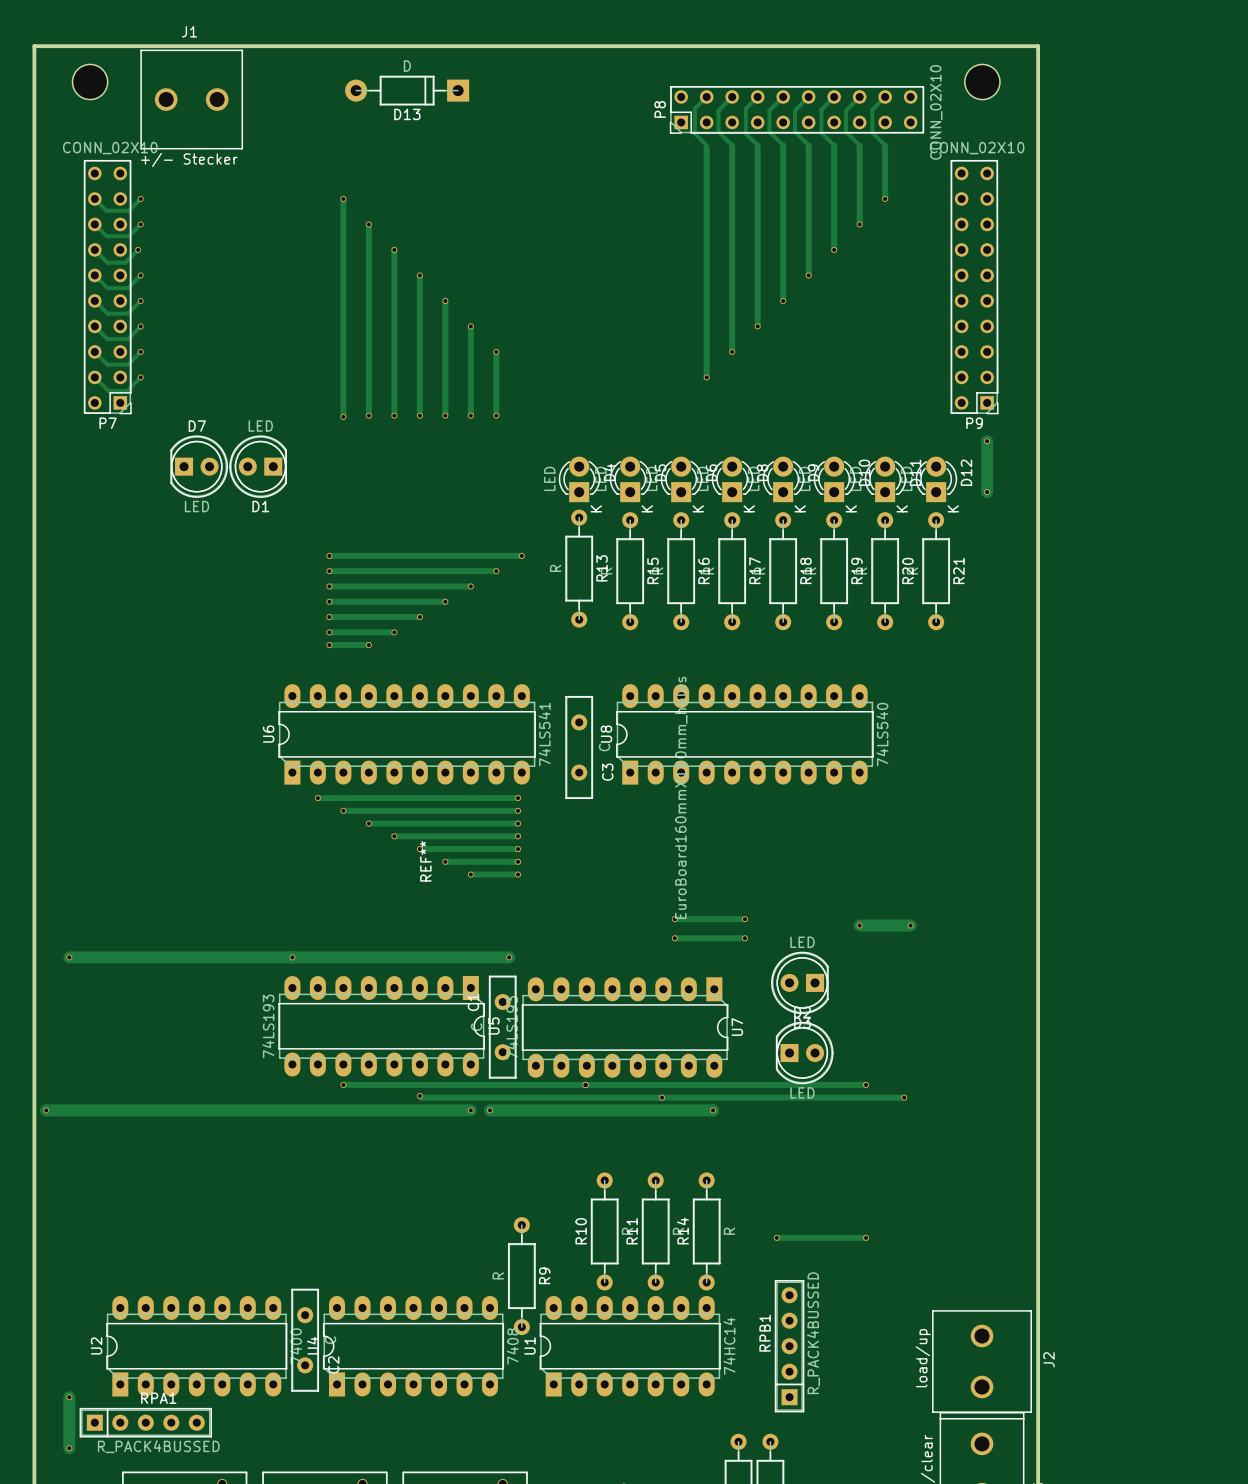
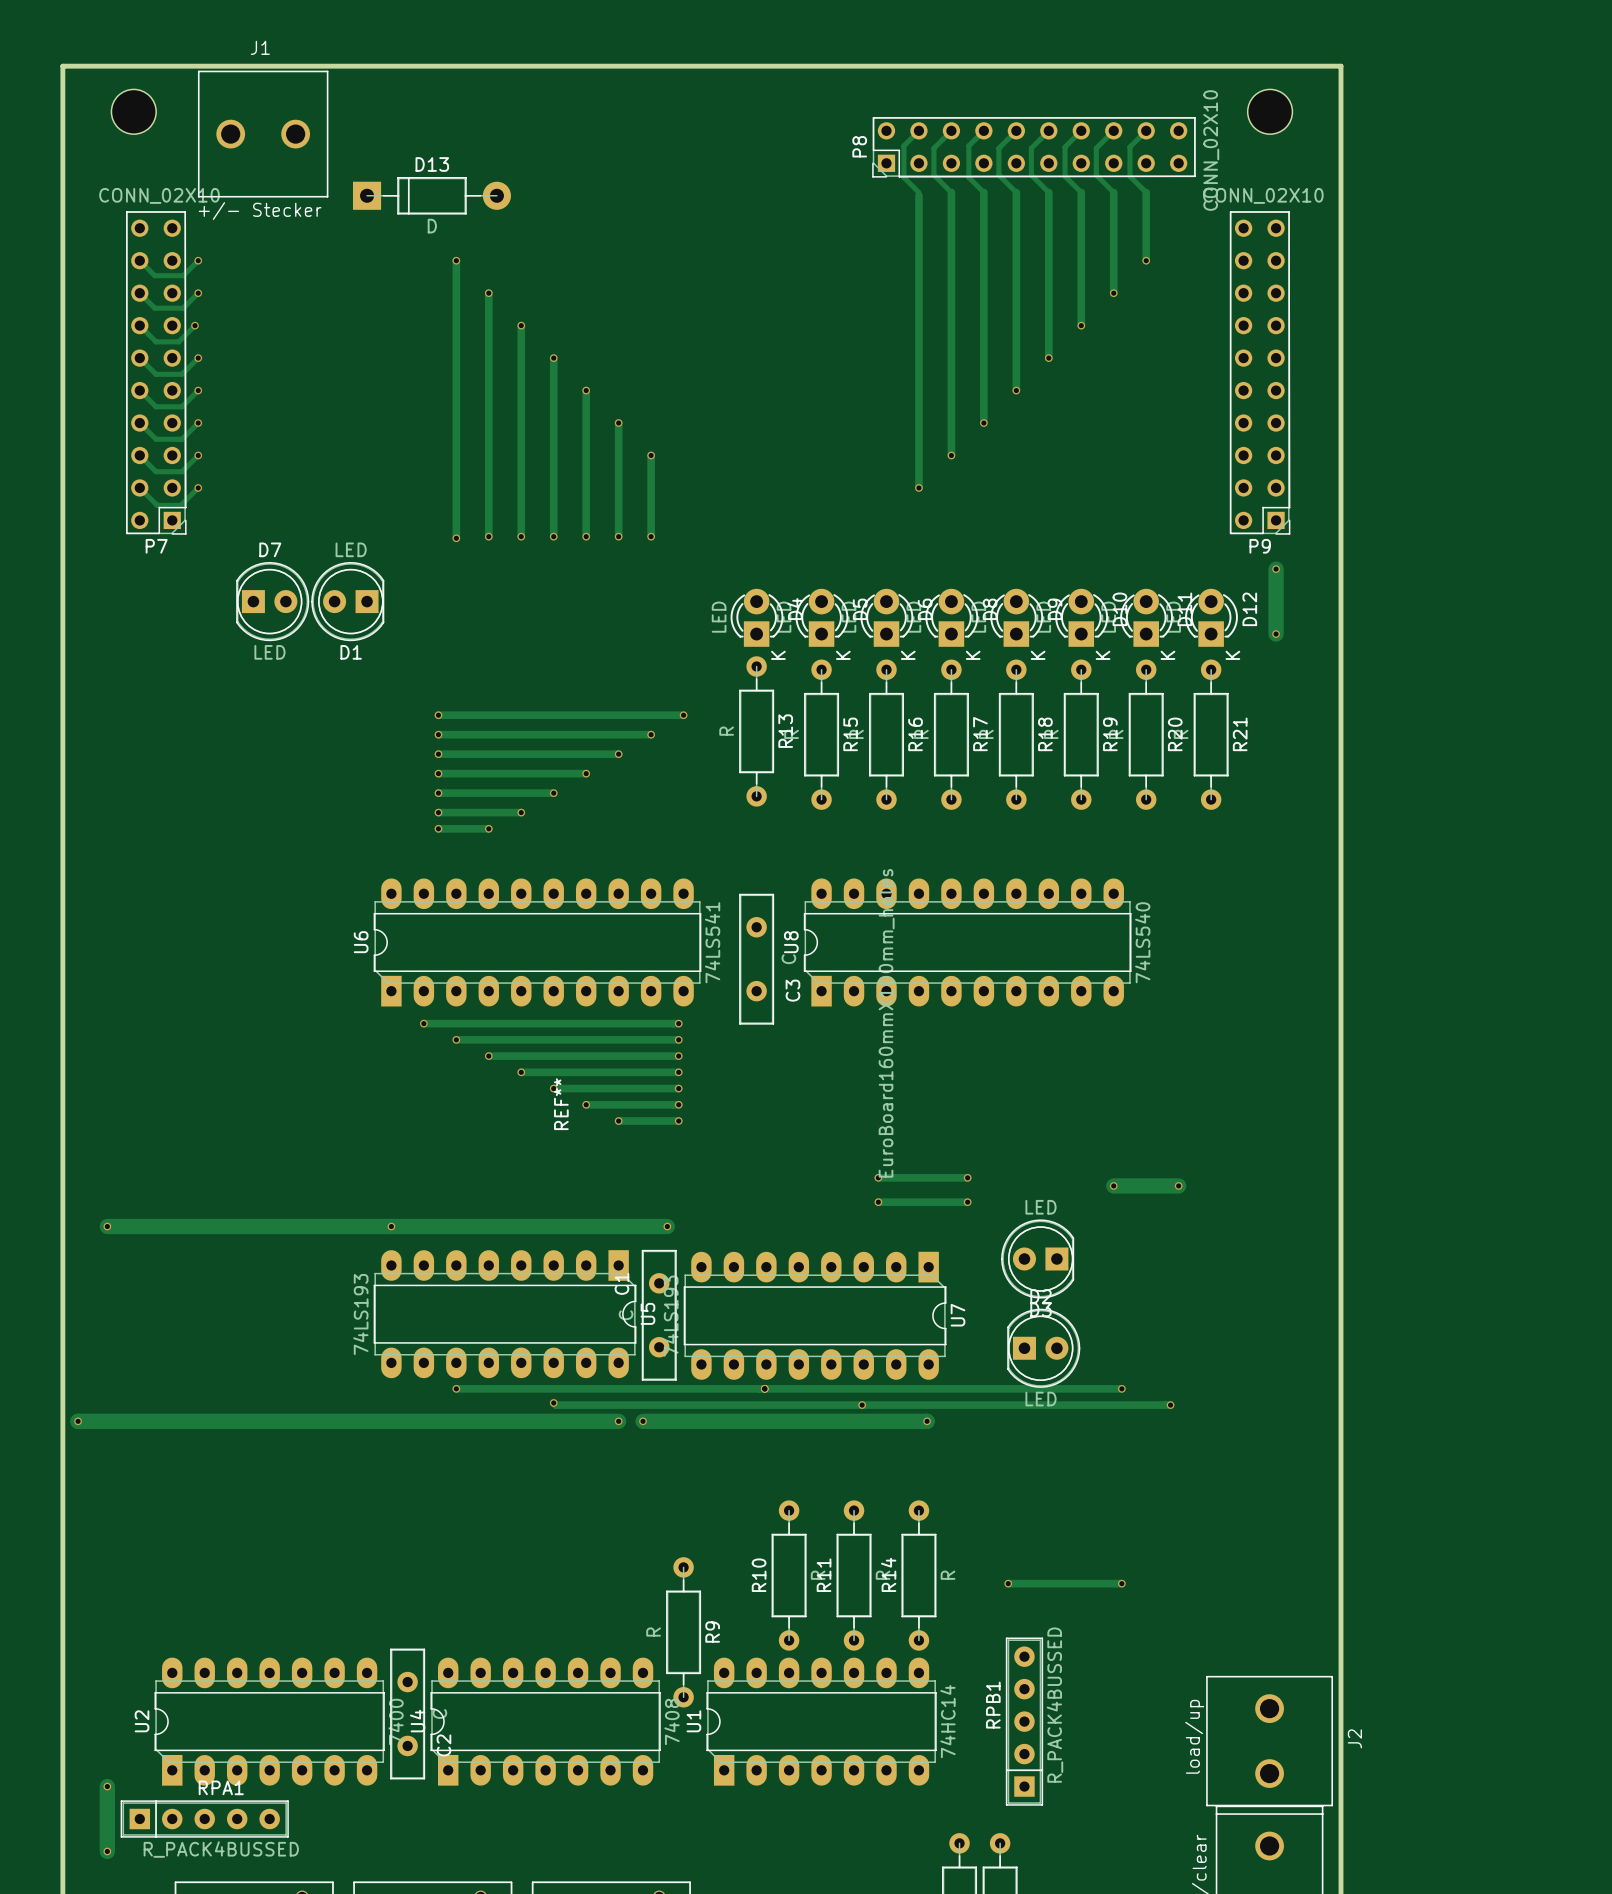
D13 rotation: 0° (407, 90) -> 180° (431, 195)
D13 position: (407, 90) -> (431, 195)

